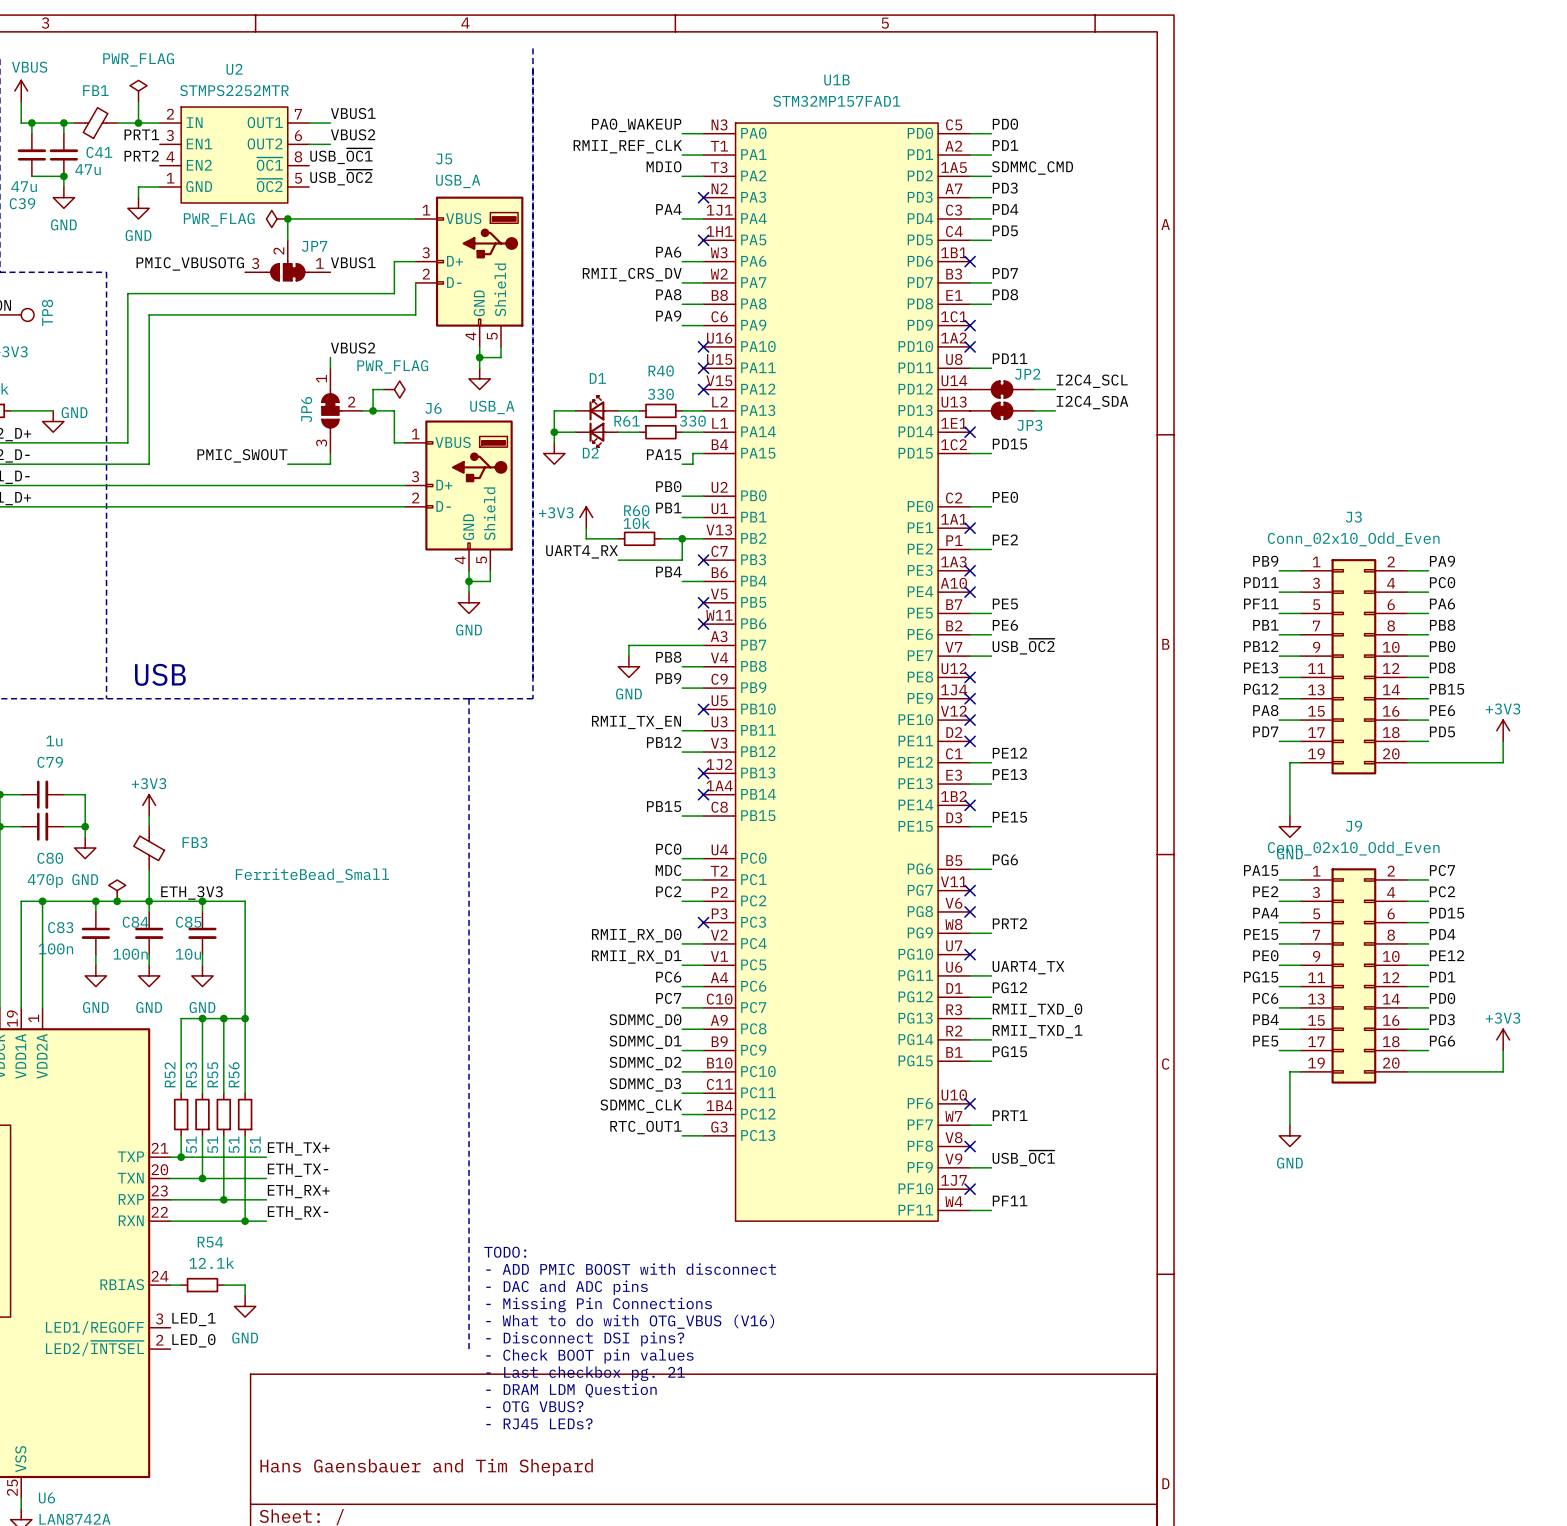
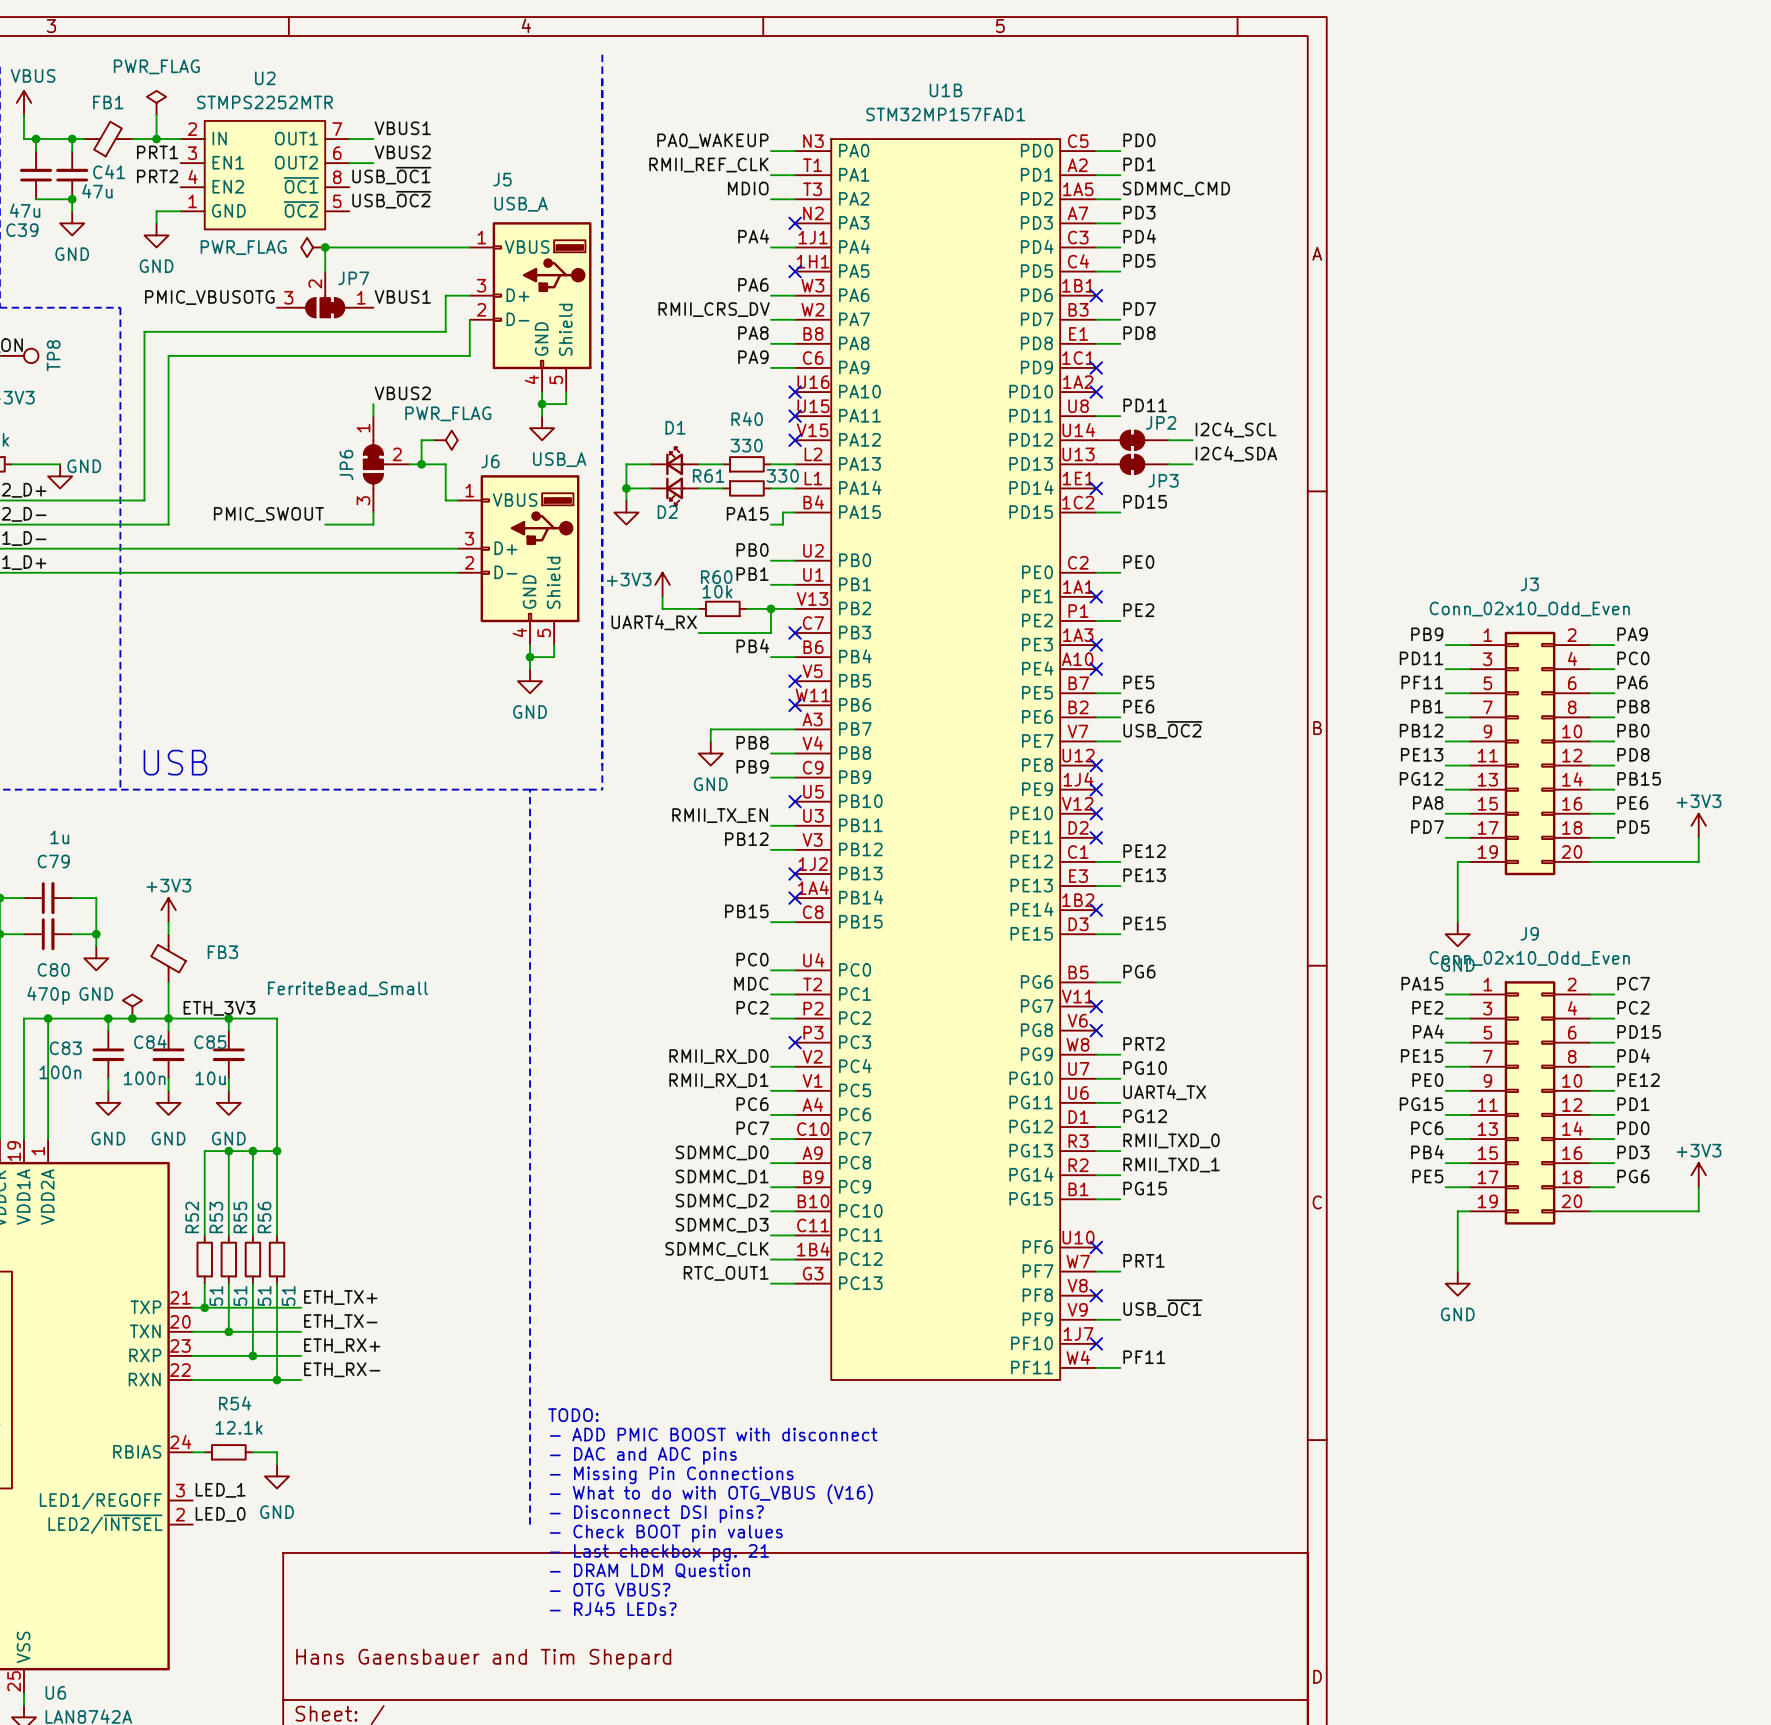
label: none -> PG10 (1145, 1068)
wire: none -> (1096, 1078) (1120, 1078)
no-connect mark: (970, 954) -> none

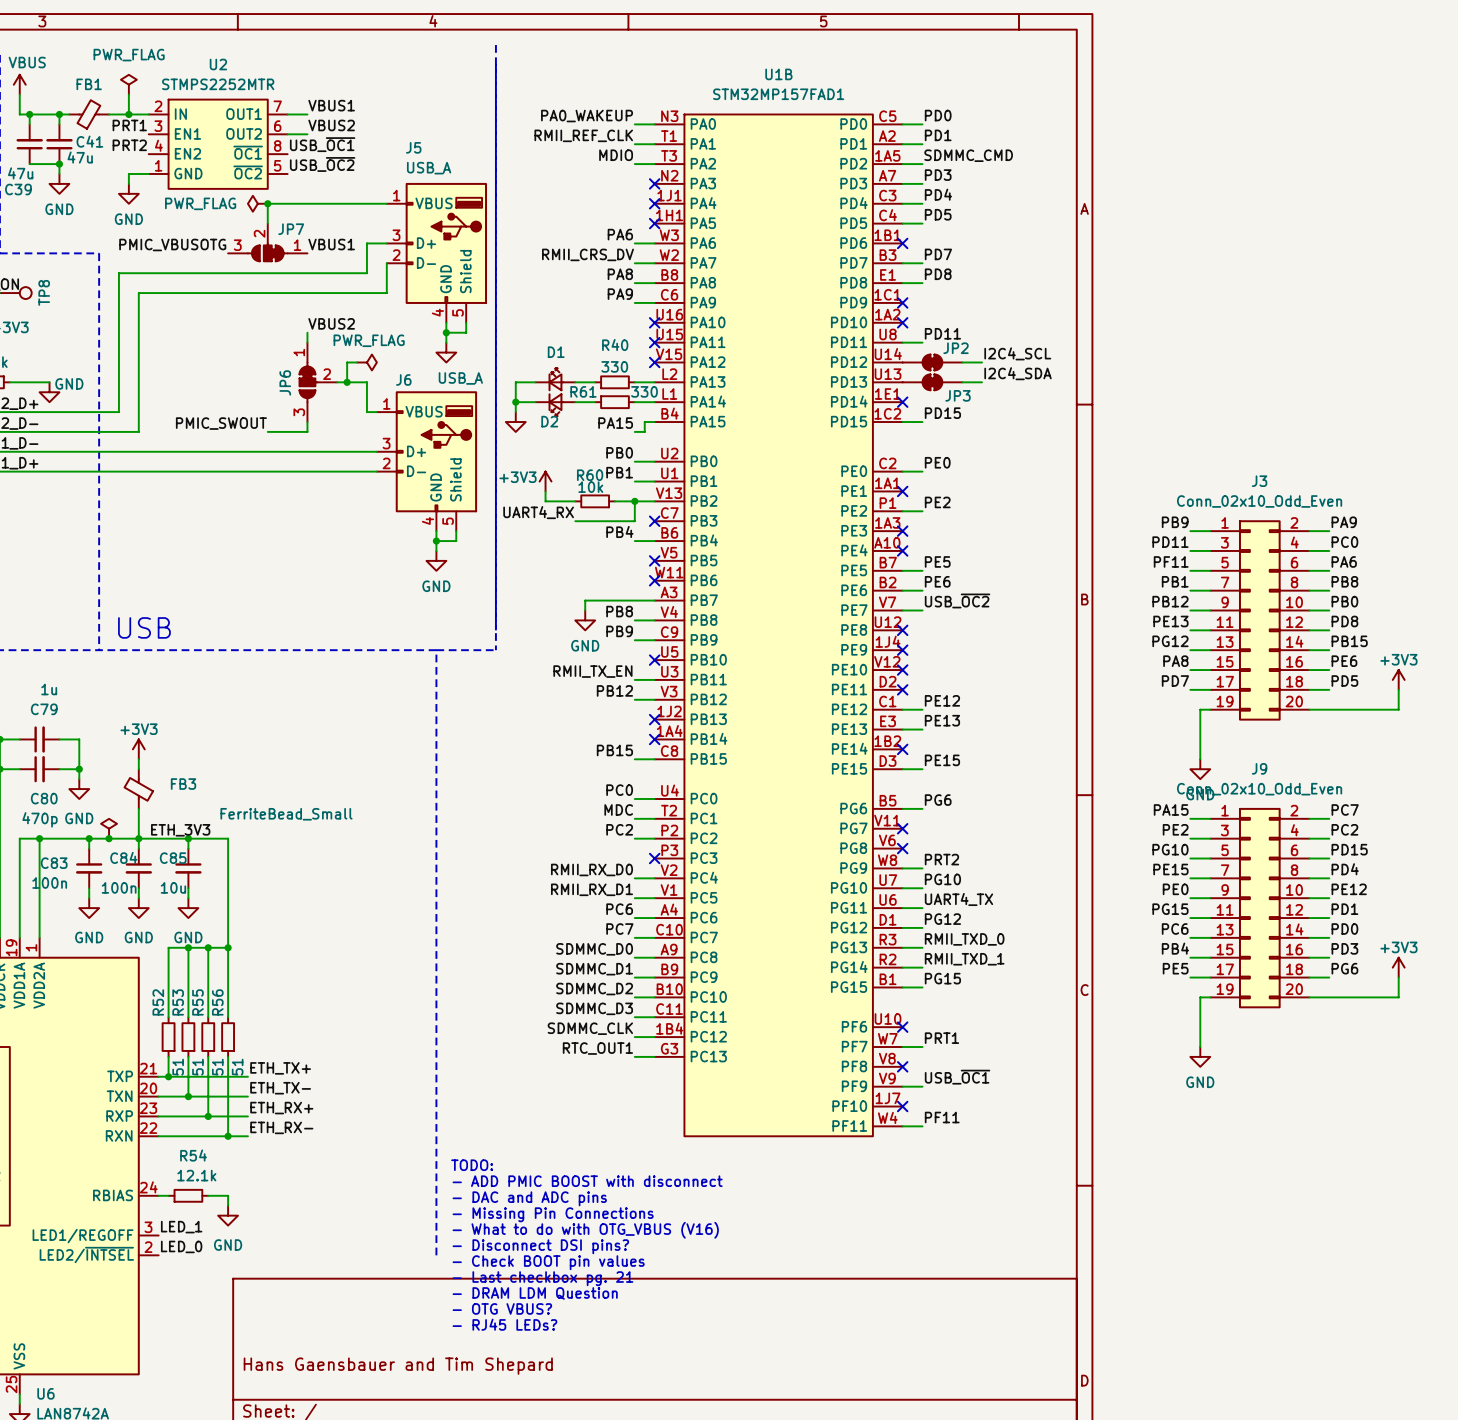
label: PA4 (753, 236) -> none
wire: (771, 247) (795, 247) -> none
no-connect mark: none -> (654, 203)
label: PA4 (1428, 1031) -> PG10 (1170, 849)

